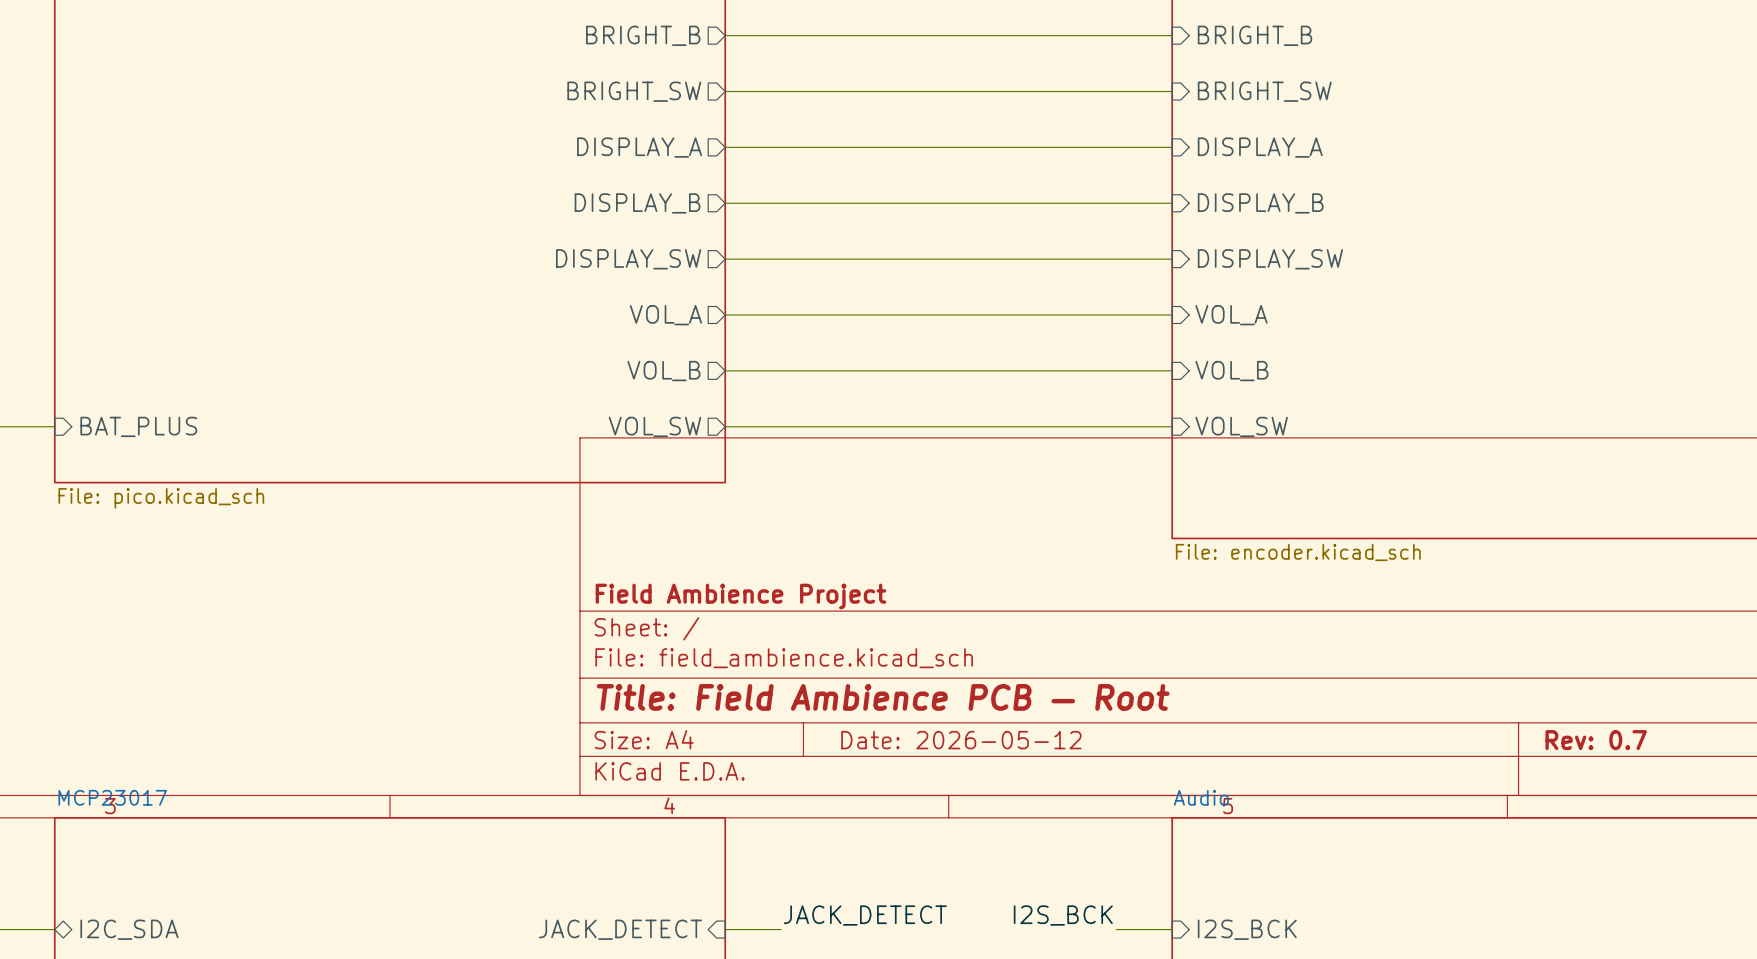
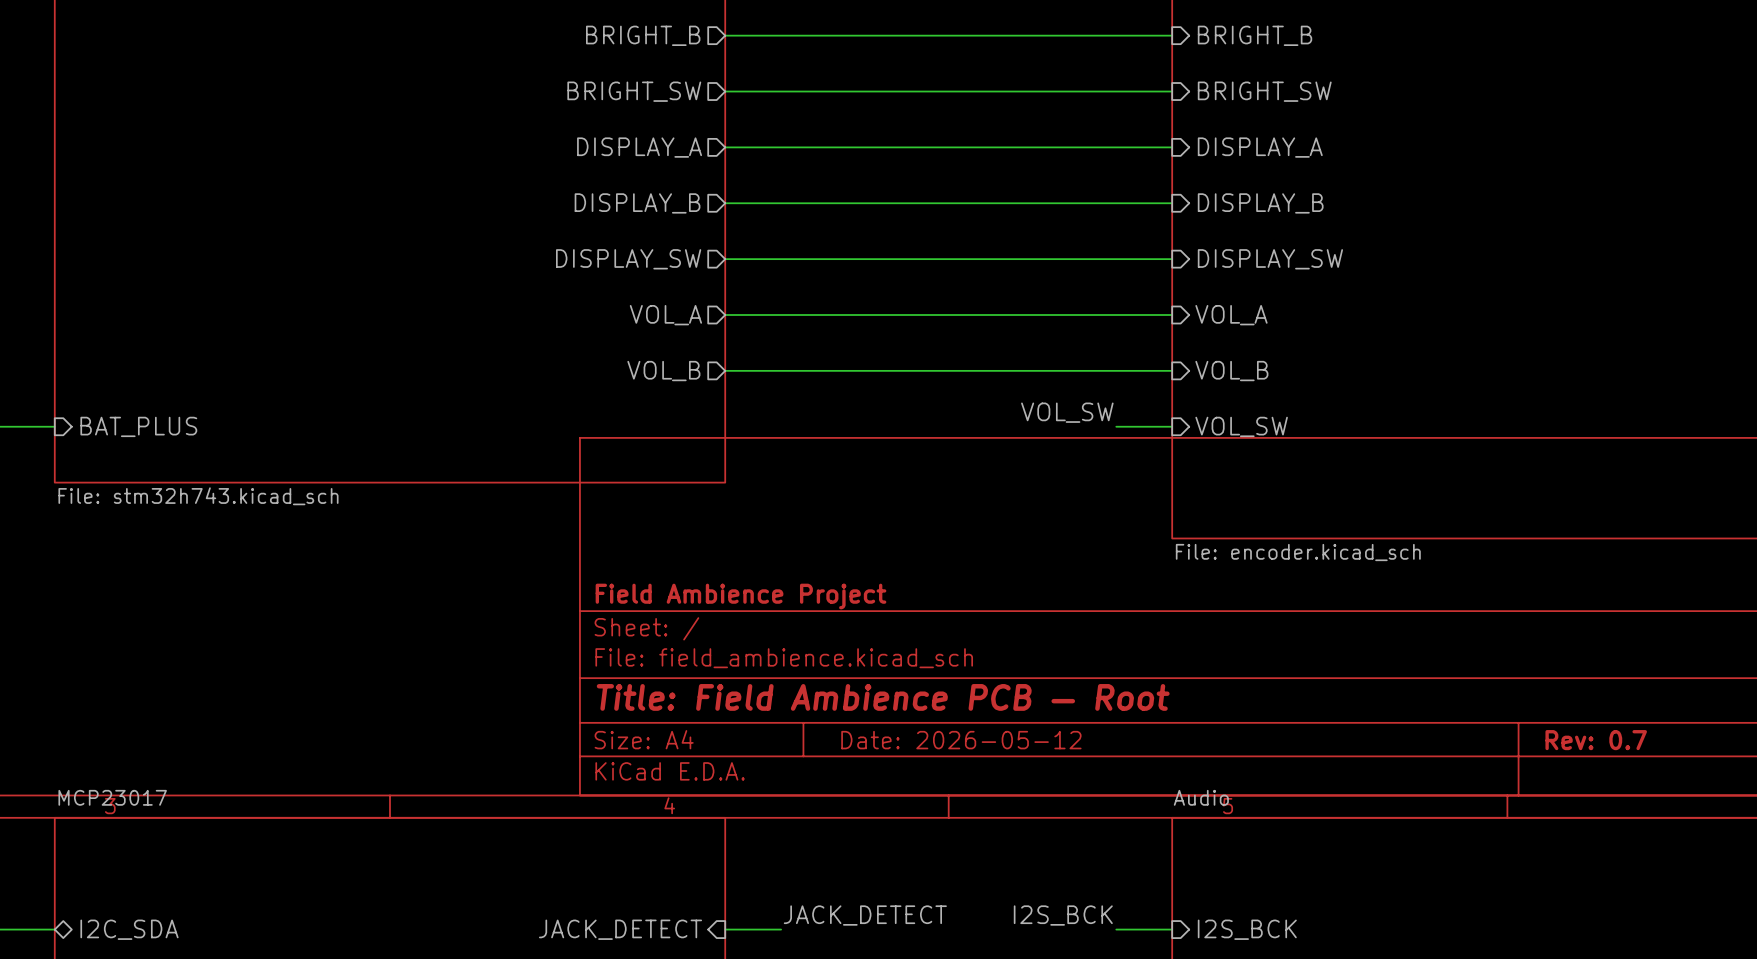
label: none -> VOL_SW (1067, 412)
sheet pin: VOL_SW (654, 426) -> none
wire: (725, 426) (1116, 426) -> none
sheet value: File: pico.kicad_sch (161, 498) -> File: stm32h743.kicad_sch (198, 496)

